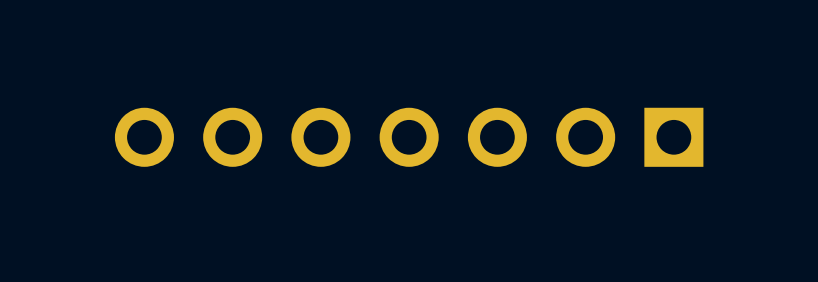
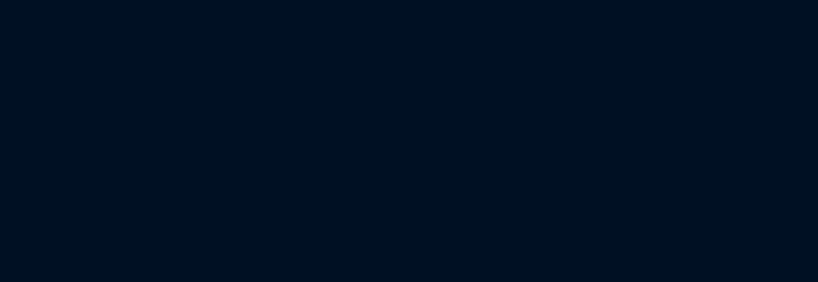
part: (409, 137) -> none

